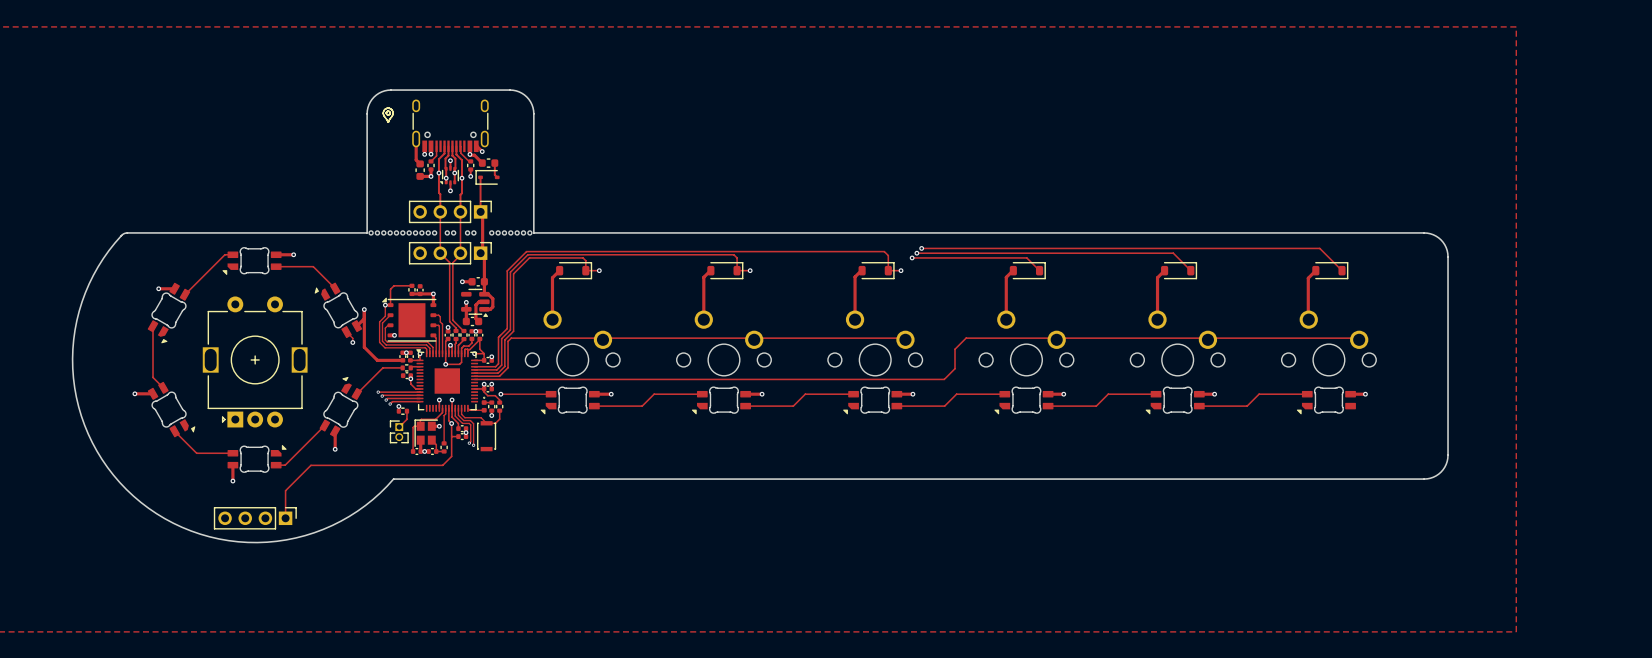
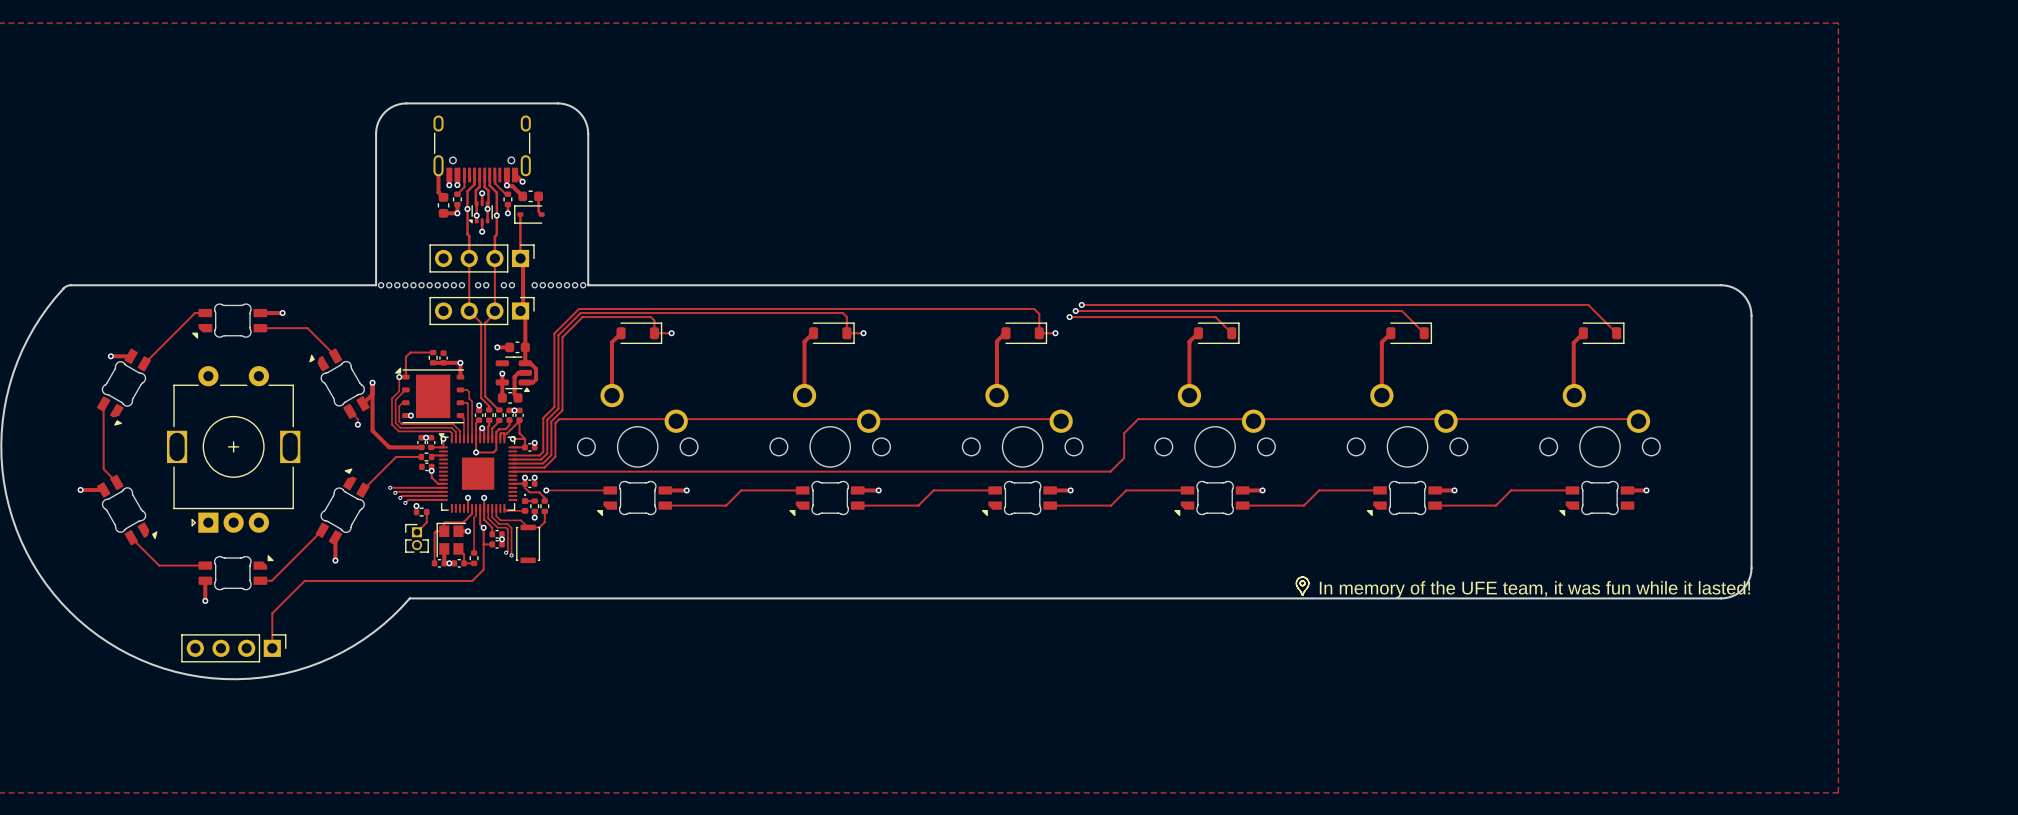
line: (386, 111) (389, 111) (389, 114) -> none
line: (386, 112) (387, 114) (389, 114) -> none
line: (387, 121) (383, 113) (388, 108) (393, 112) (388, 121) -> none
line: none -> (1304, 577) (1308, 584) (1303, 594)
line: none -> (1304, 577) (1299, 578) (1296, 582) (1302, 594)
line: none -> (1300, 581) (1304, 581) (1304, 584)
line: none -> (1300, 582) (1301, 585) (1304, 584)
text: none -> In memory of the UFE team, it was fun while it lasted! (1534, 589)

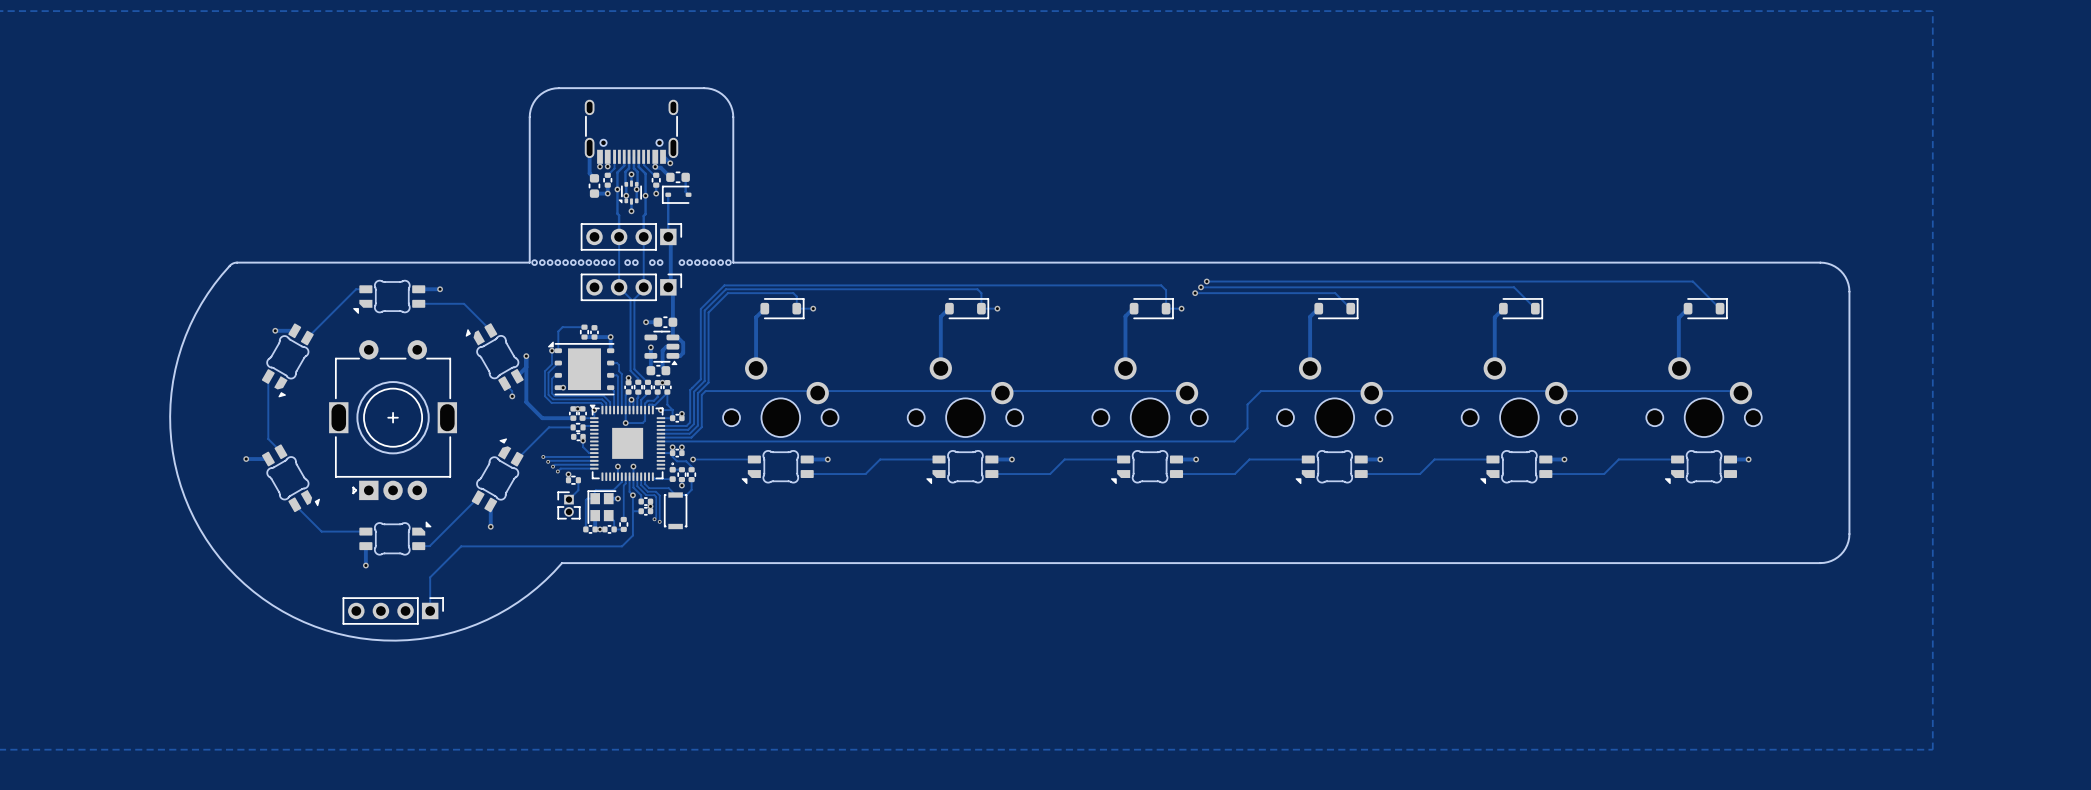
round board edge: none -> [356, 381, 430, 455]
line: (1304, 577) (1308, 584) (1303, 594) -> none
line: (1304, 577) (1299, 578) (1296, 582) (1302, 594) -> none
line: (1300, 581) (1304, 581) (1304, 584) -> none
line: (1300, 582) (1301, 585) (1304, 584) -> none
text: In memory of the UFE team, it was fun while it lasted! (1534, 589) -> none

